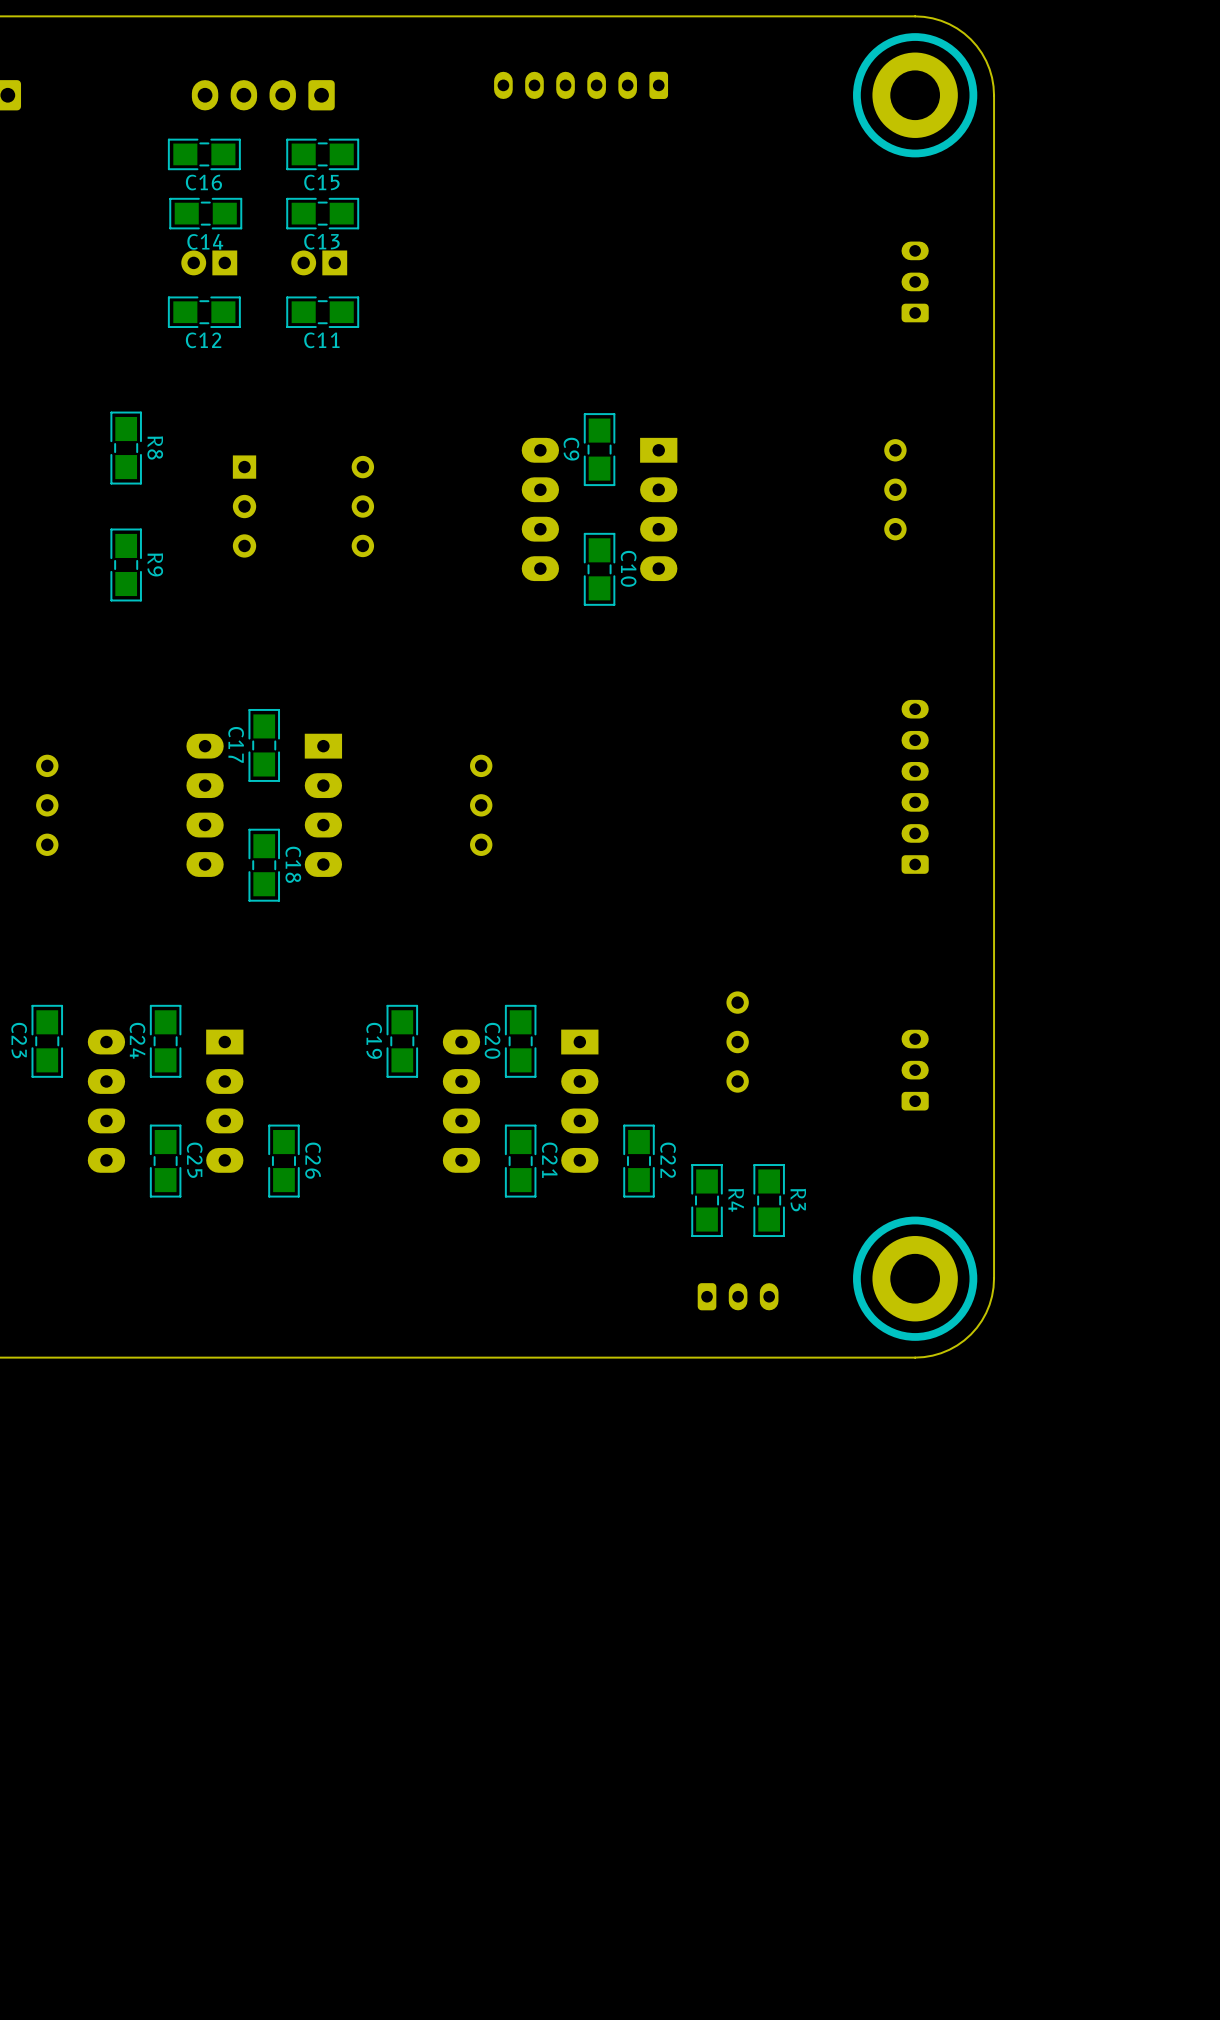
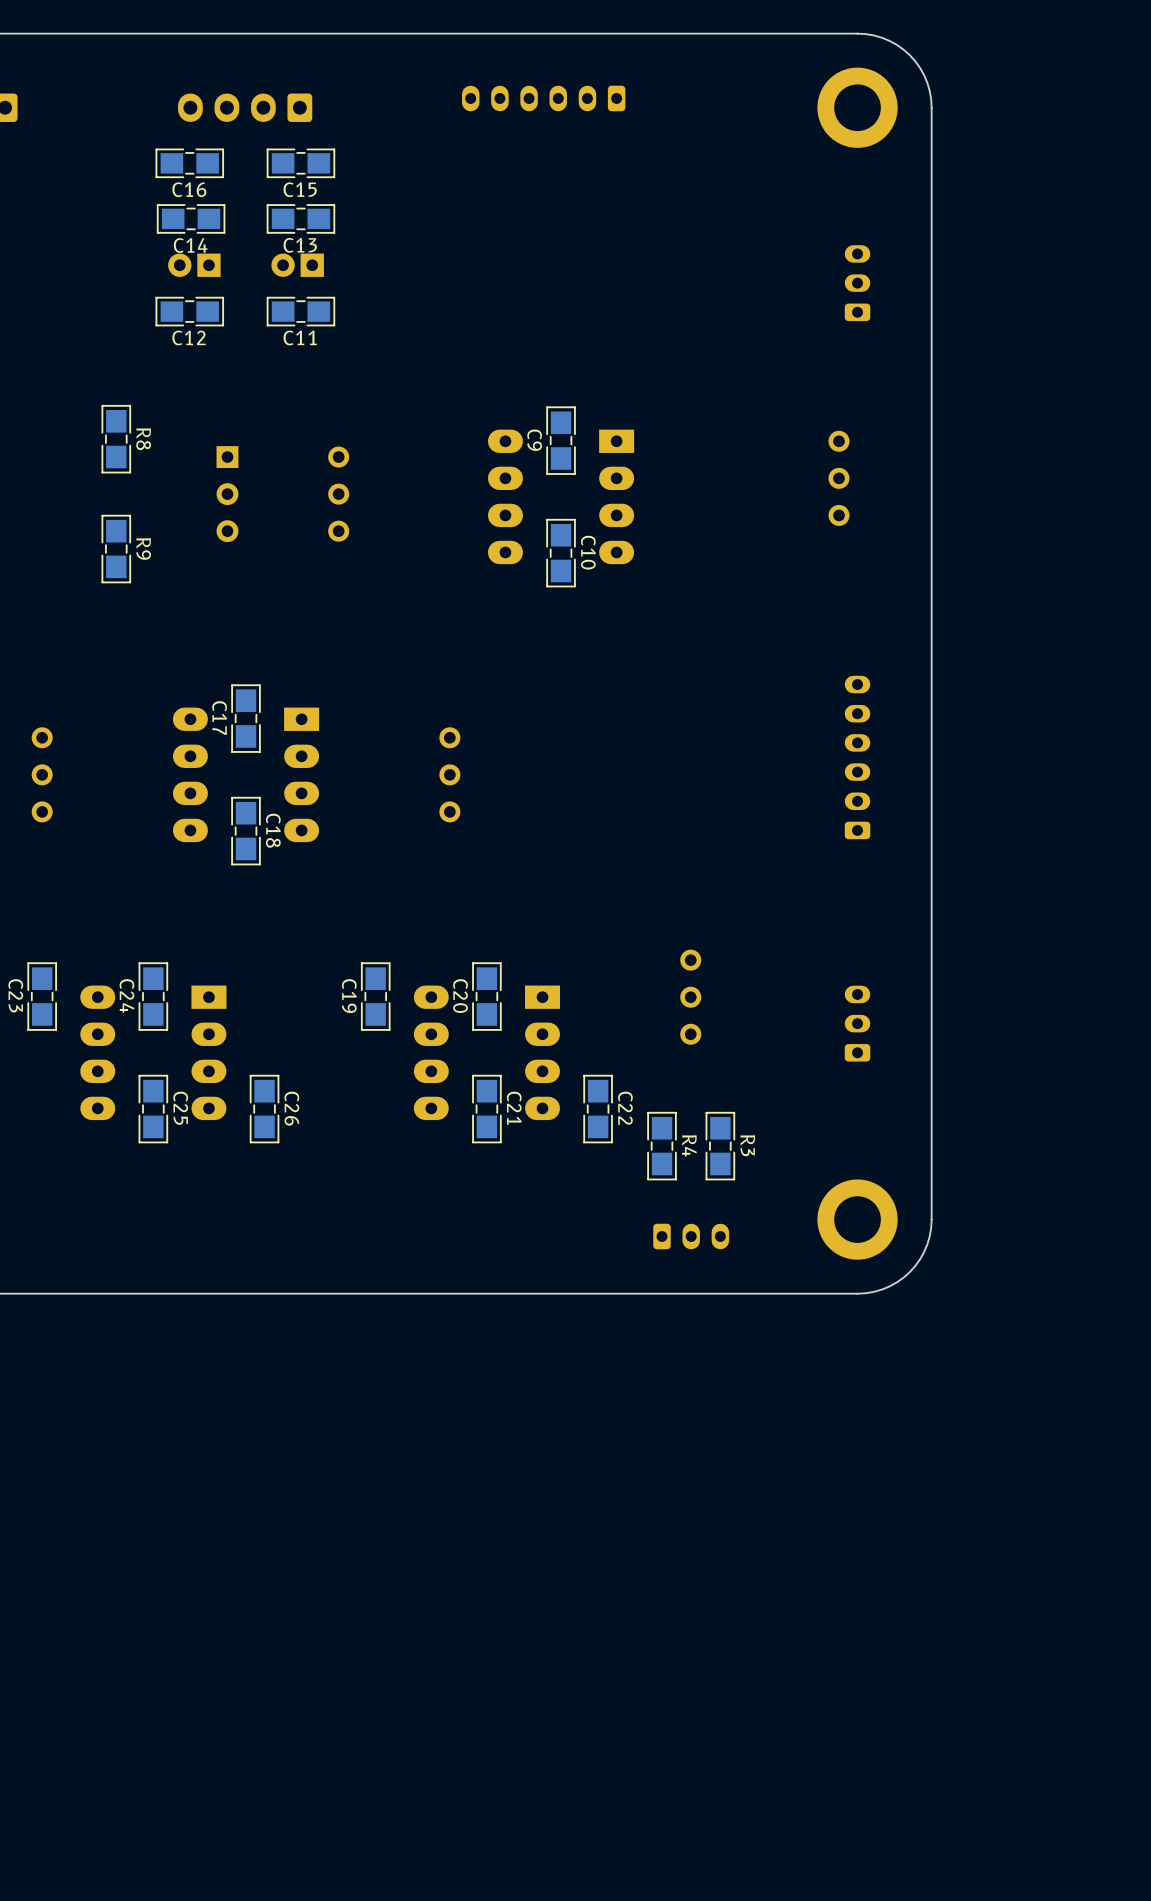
drawing: [853, 33, 978, 158] -> none
drawing: [853, 1216, 978, 1341] -> none

